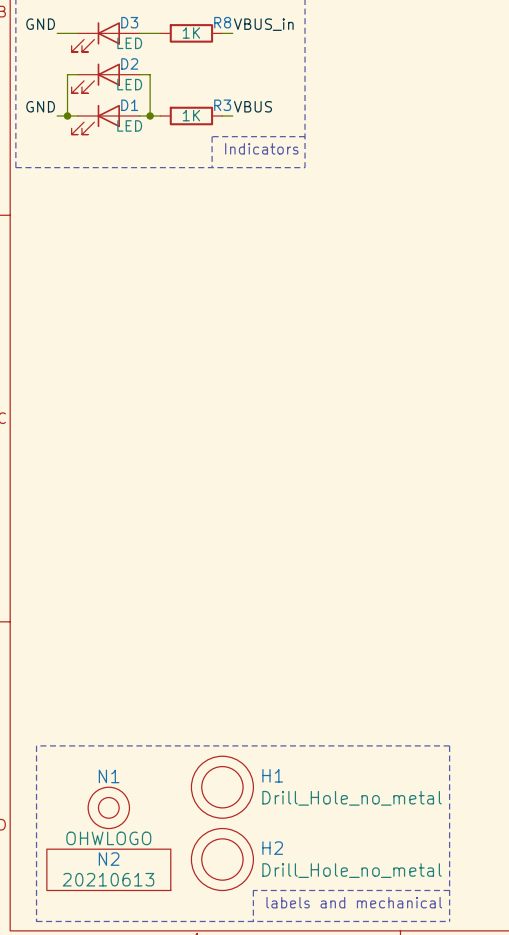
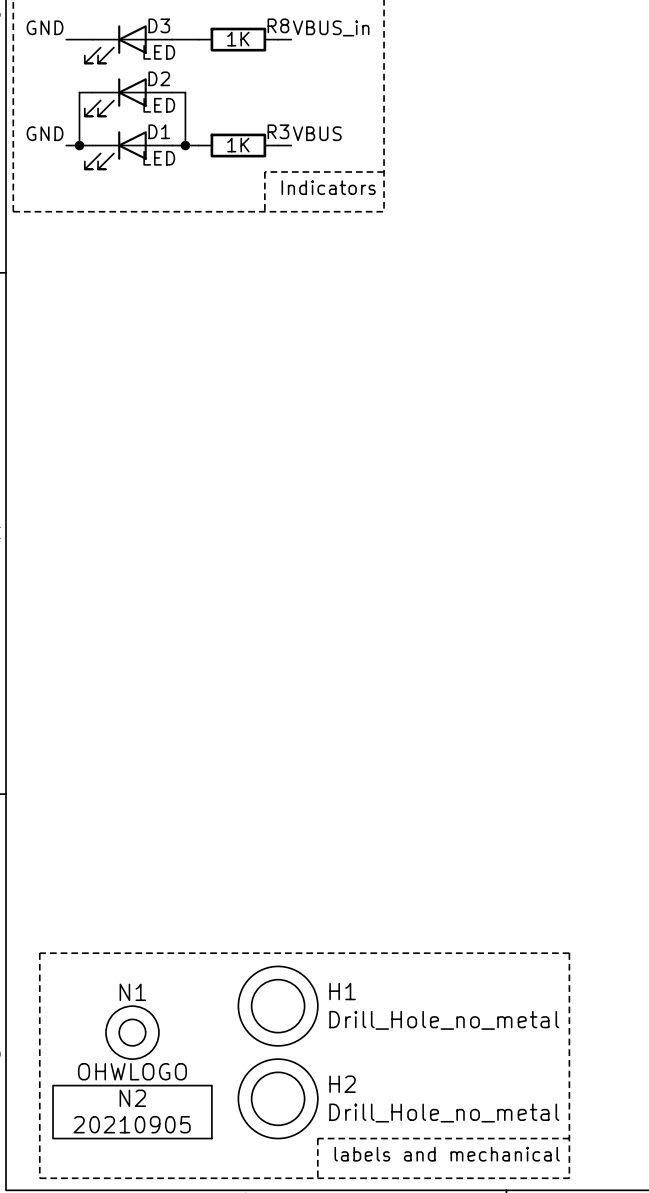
N2 value: 20210613 (108, 879) -> 20210905 (132, 1124)

